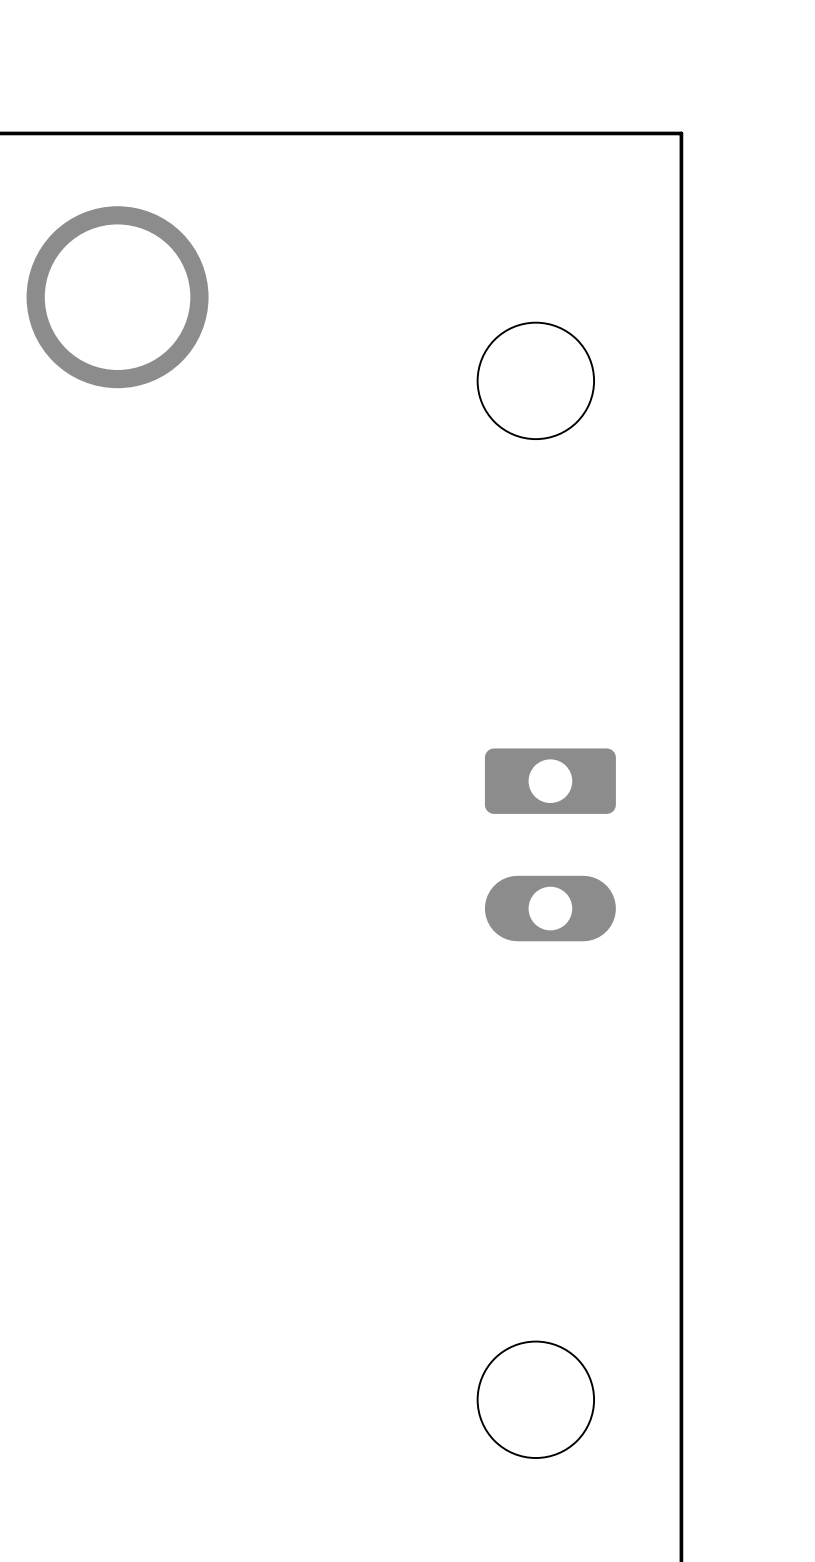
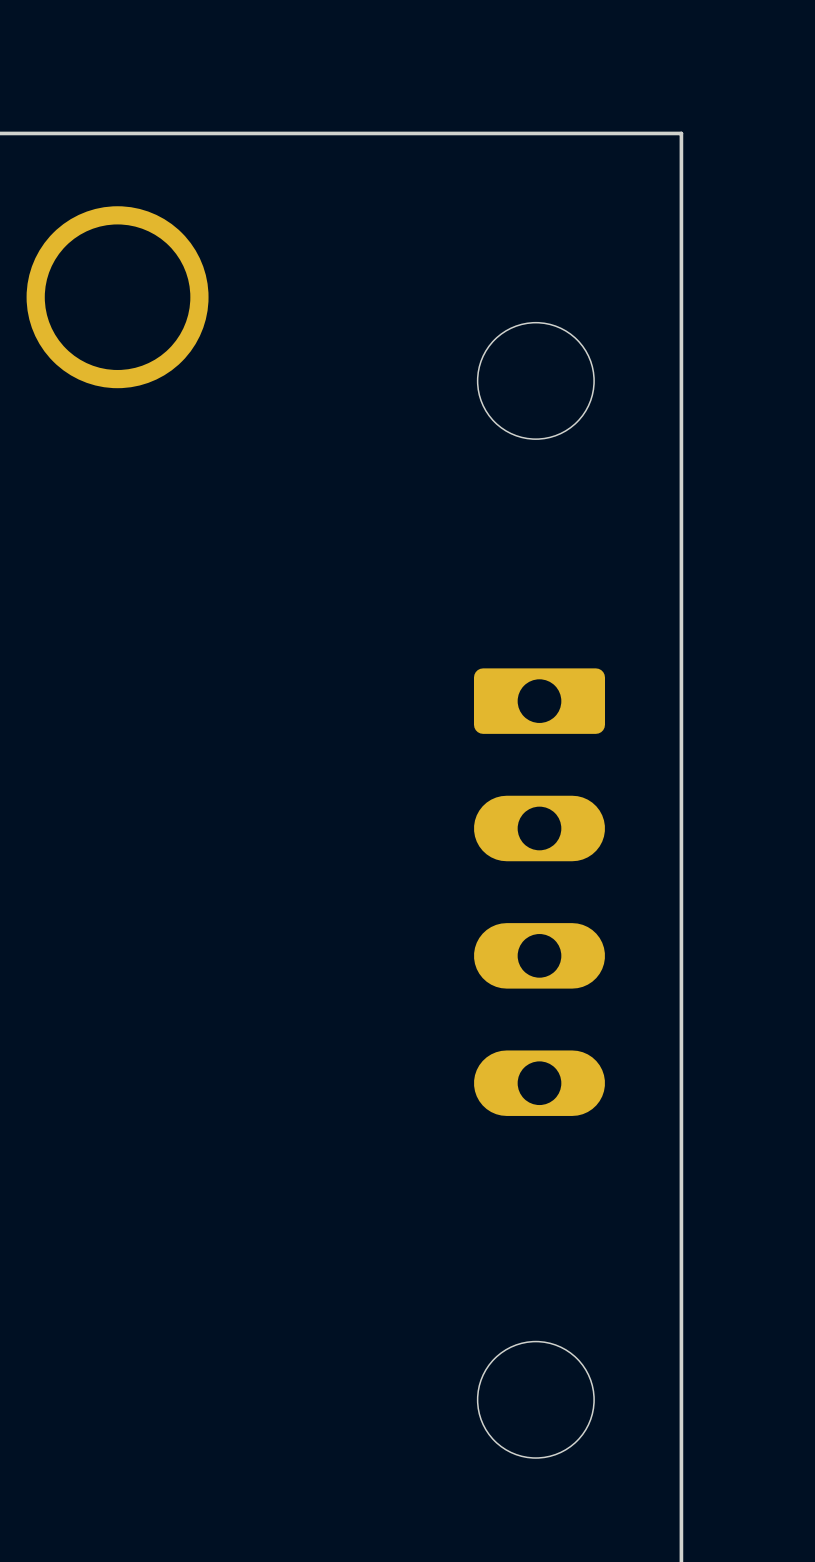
part: (550, 844) -> none
part: none -> (539, 892)

